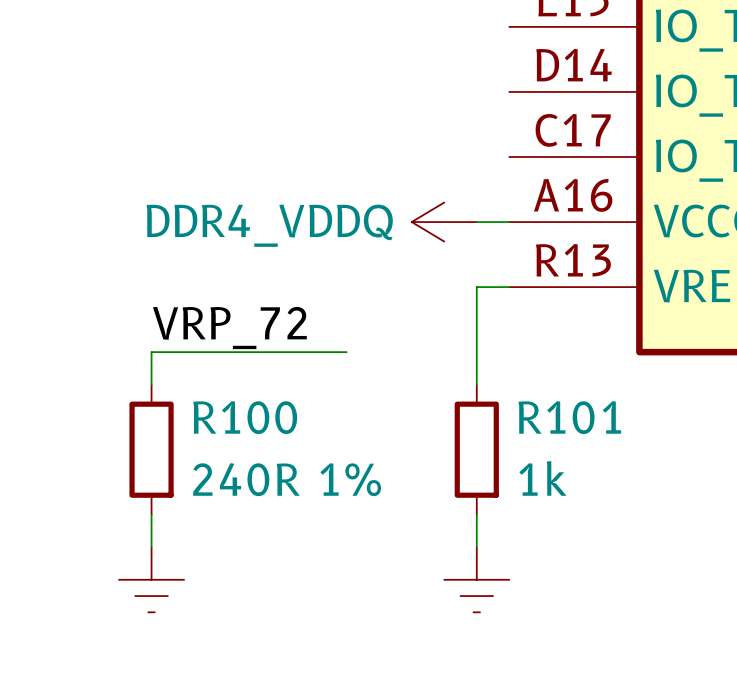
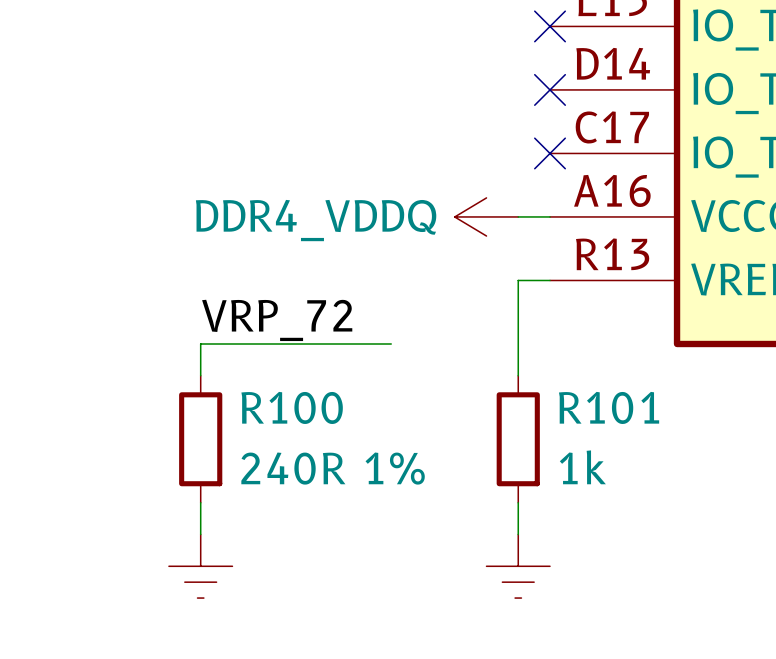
no-connect mark: none -> (550, 26)
no-connect mark: none -> (550, 89)
no-connect mark: none -> (550, 153)

